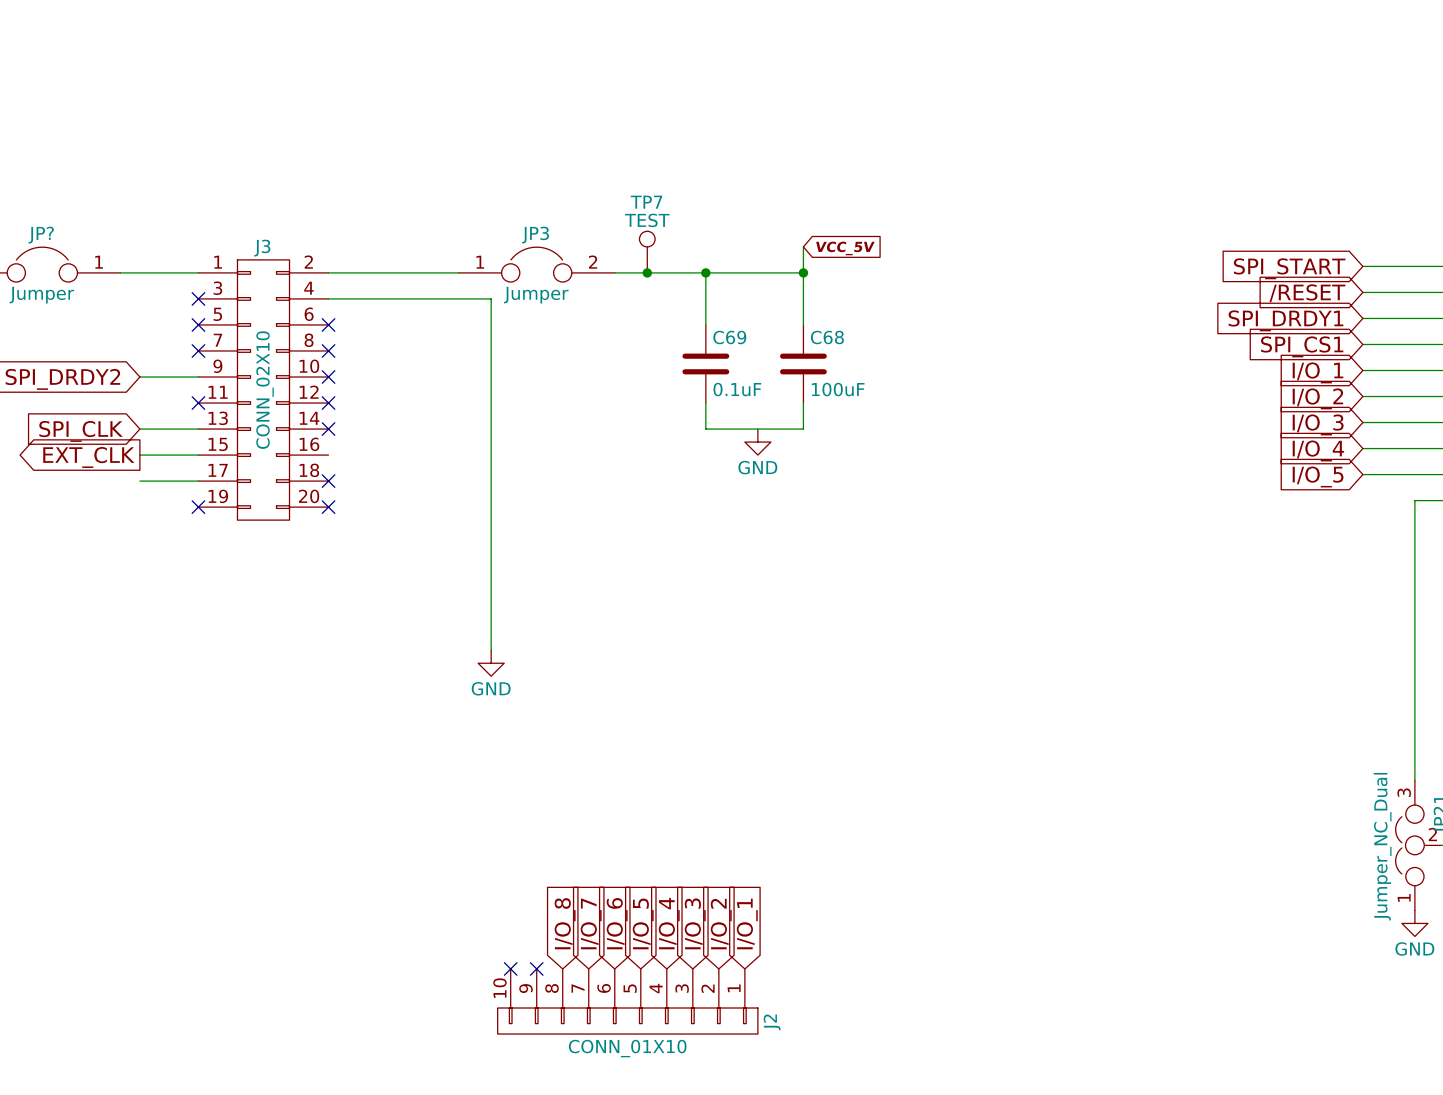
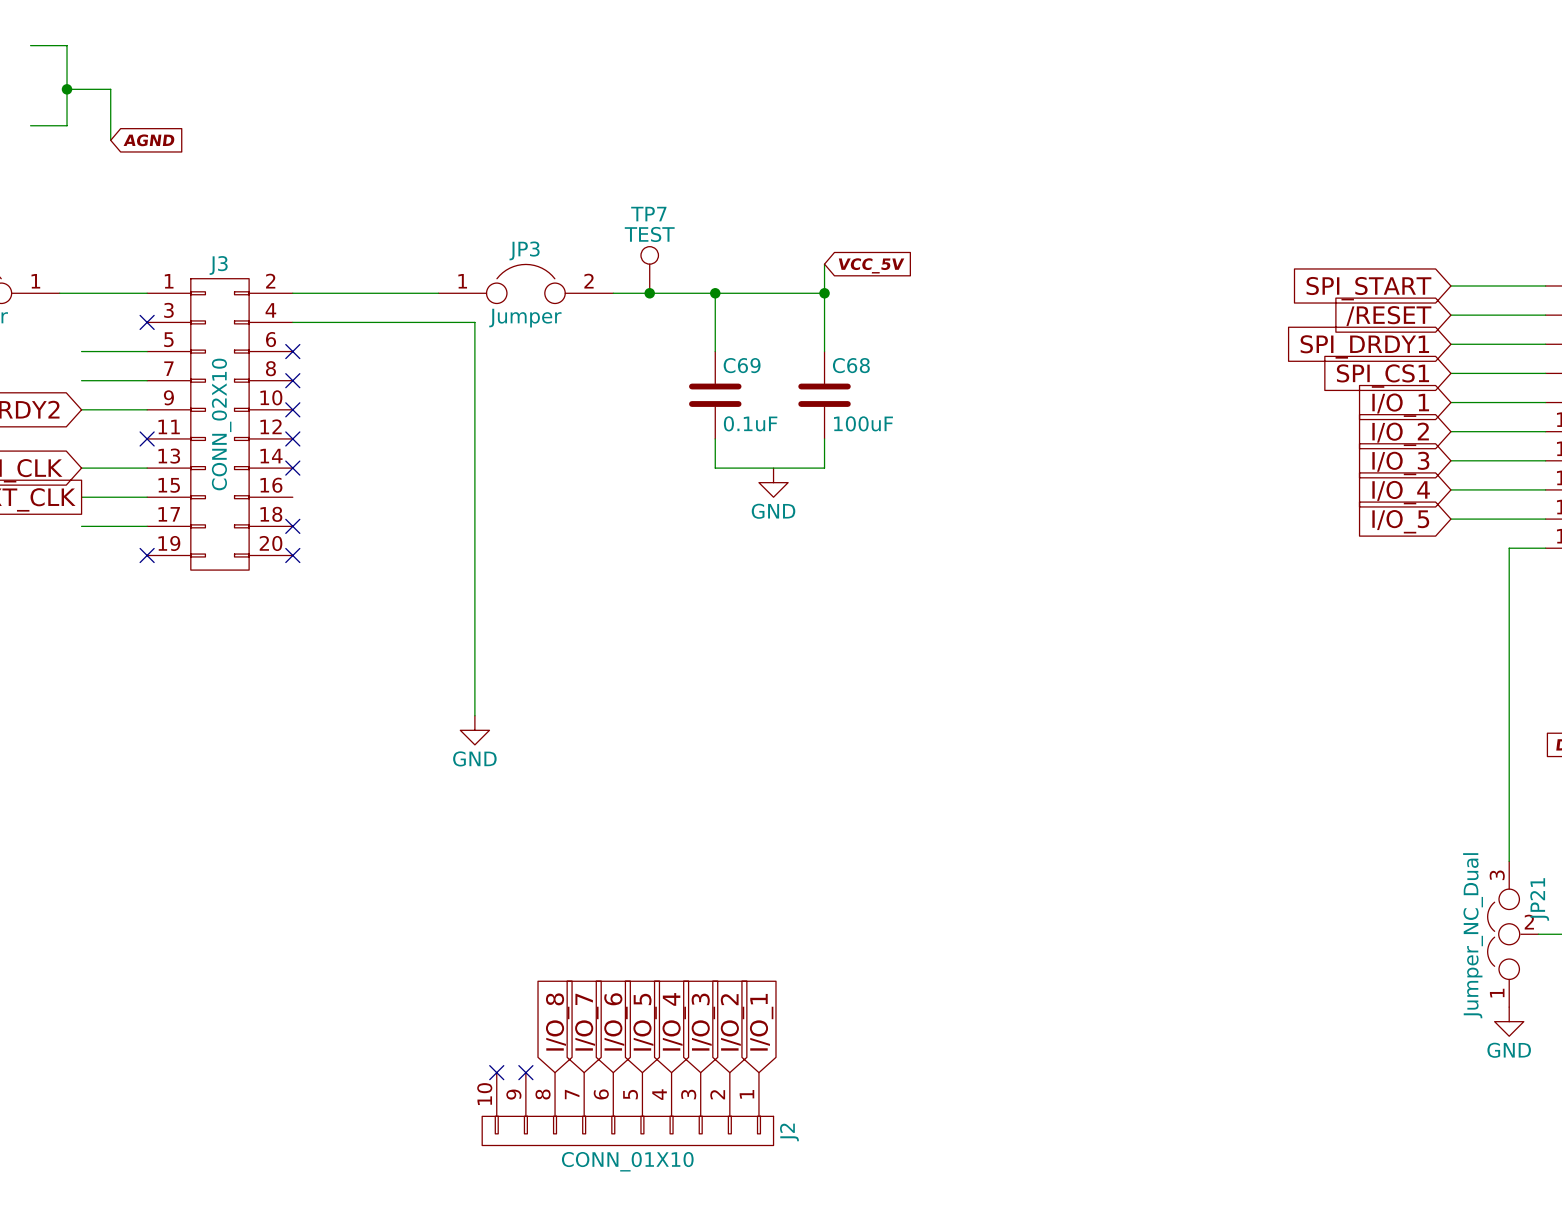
wire: none -> (30, 45) (67, 45) (67, 125) (30, 125)
wire: none -> (67, 89) (110, 89) (110, 140)
junction: none -> (67, 89)
global label: none -> AGND (148, 140)
wire: none -> (81, 351) (147, 351)
no-connect mark: (198, 324) -> none
wire: none -> (81, 380) (147, 380)
no-connect mark: (198, 350) -> none

